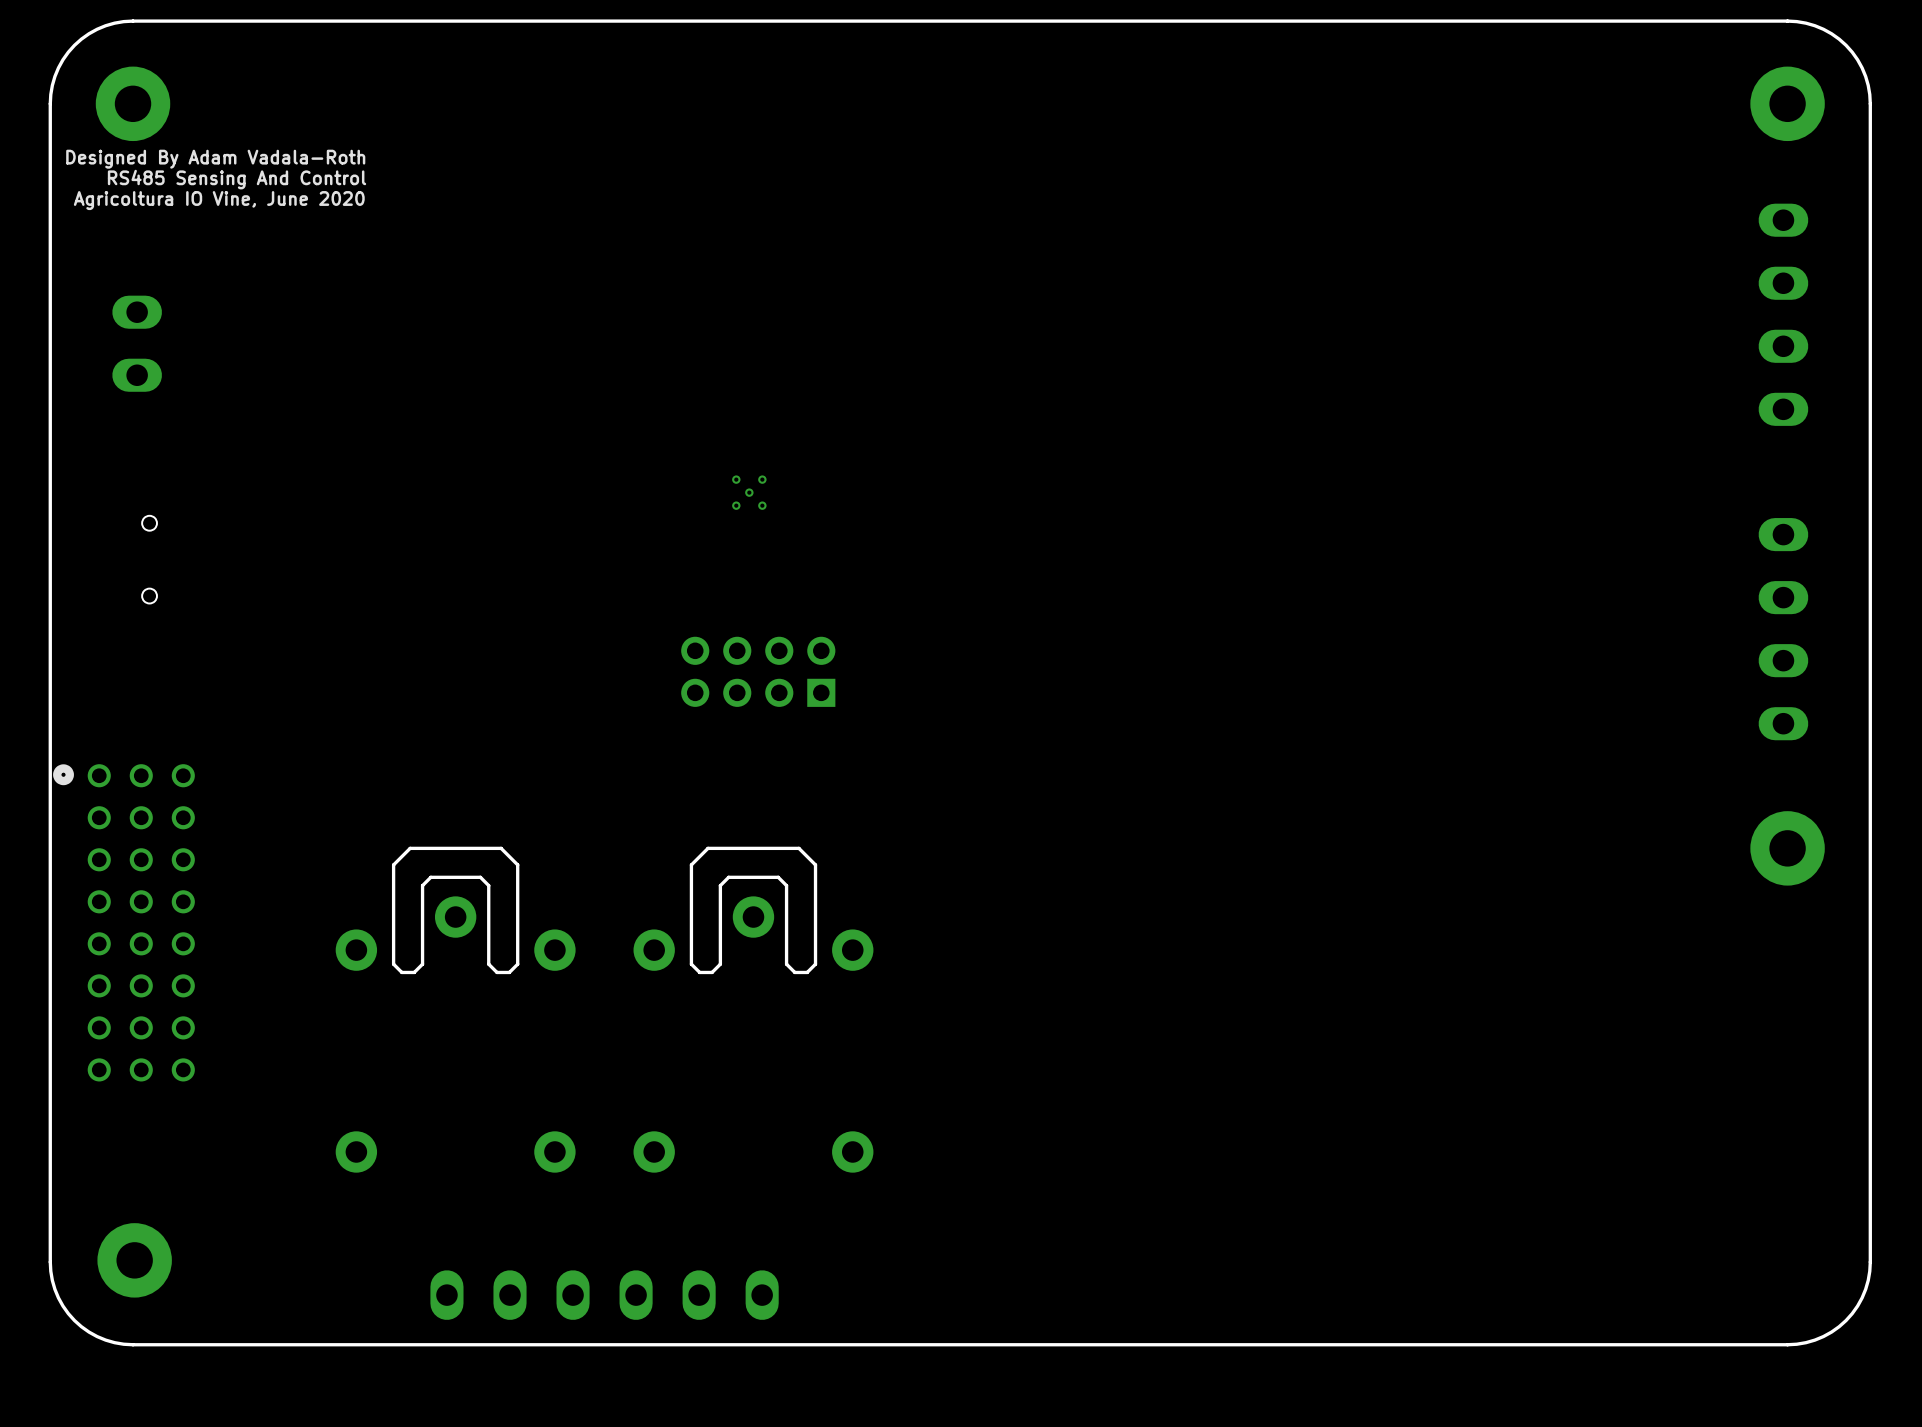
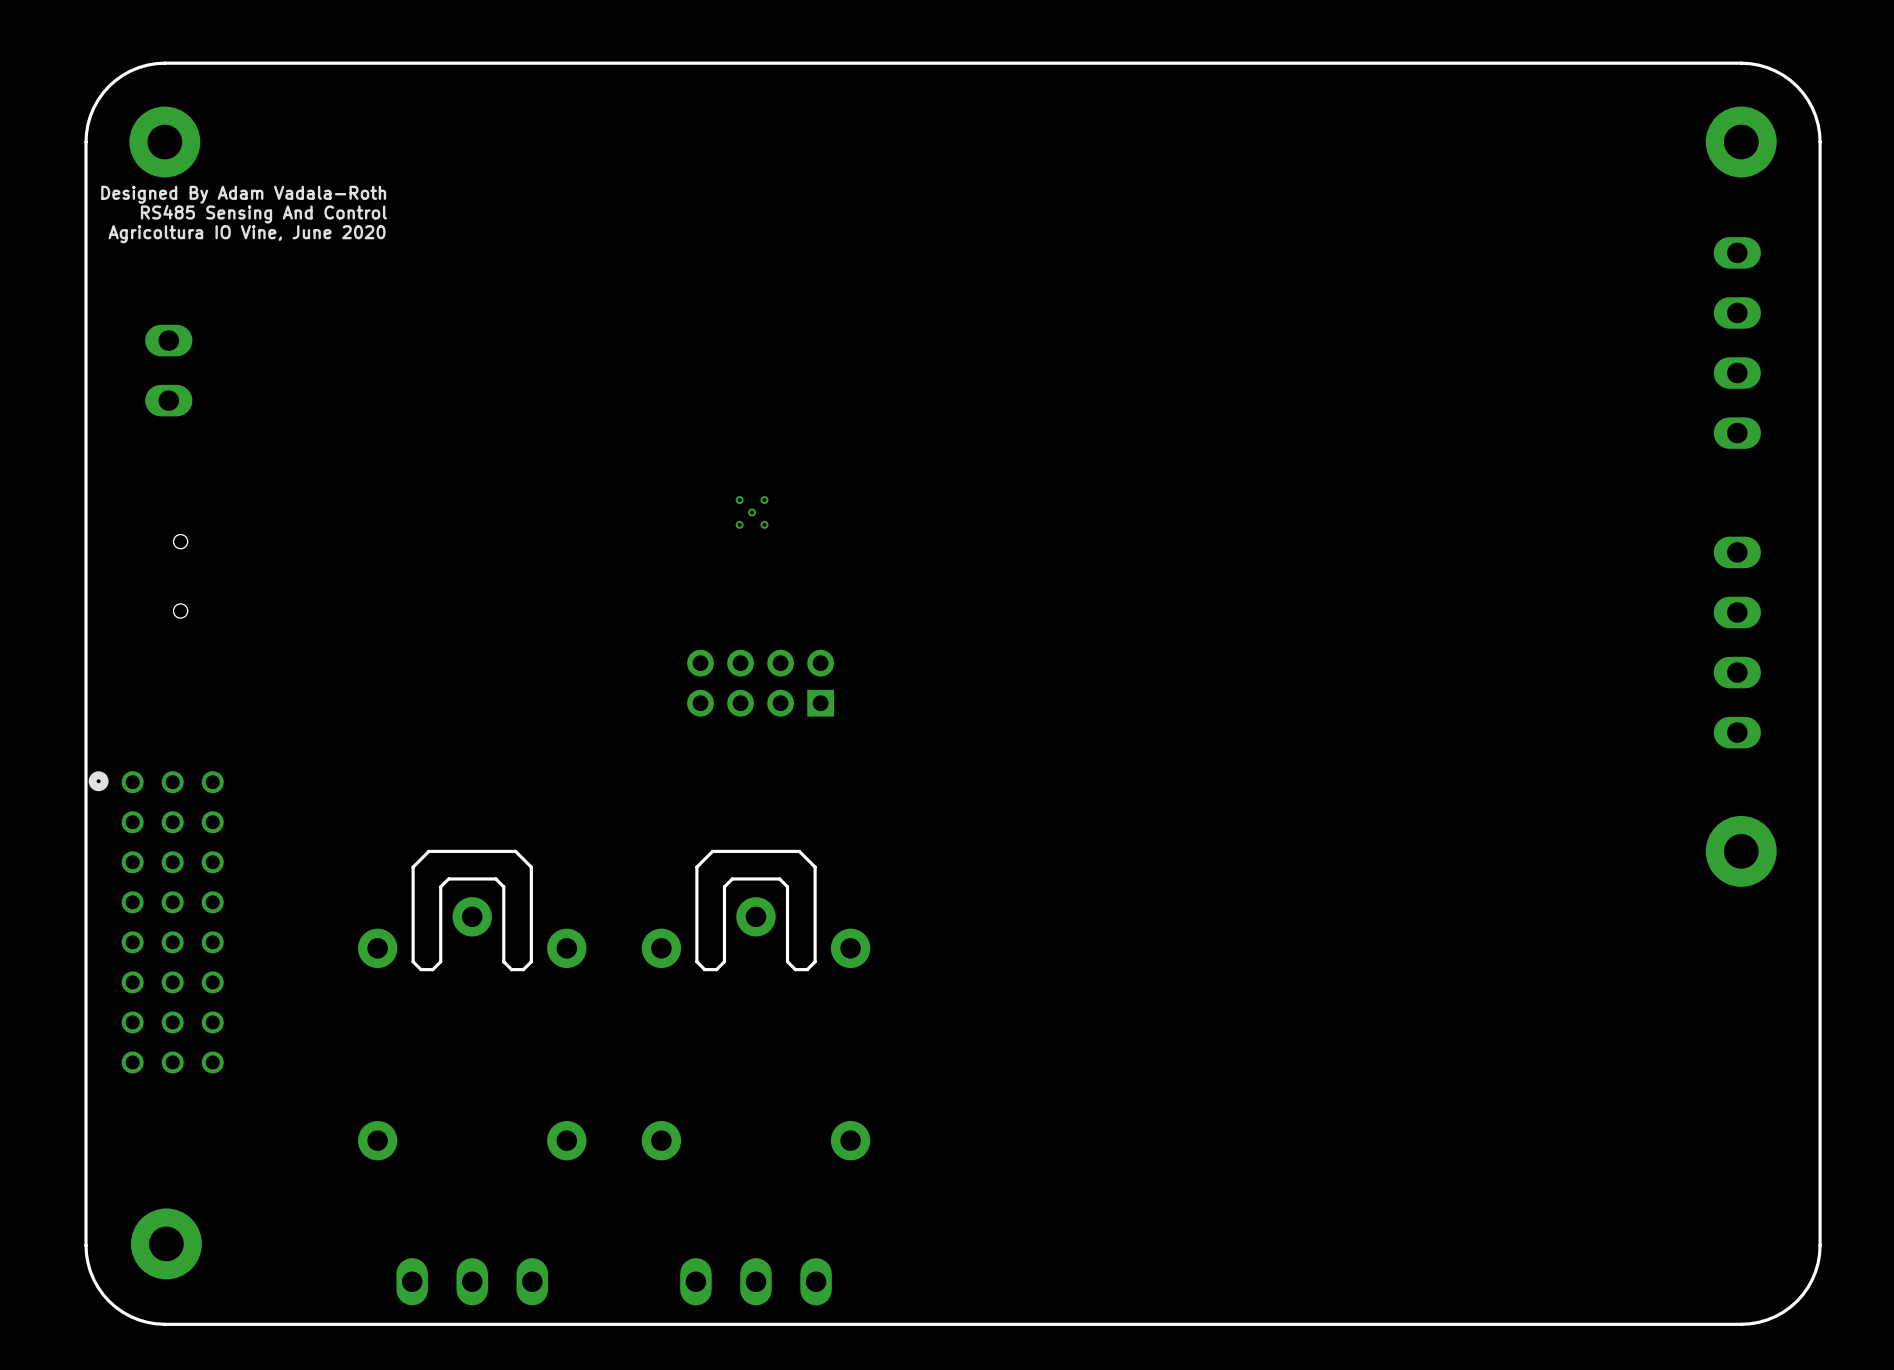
part: (604, 1295) -> none
part: none -> (472, 1281)
part: none -> (756, 1281)

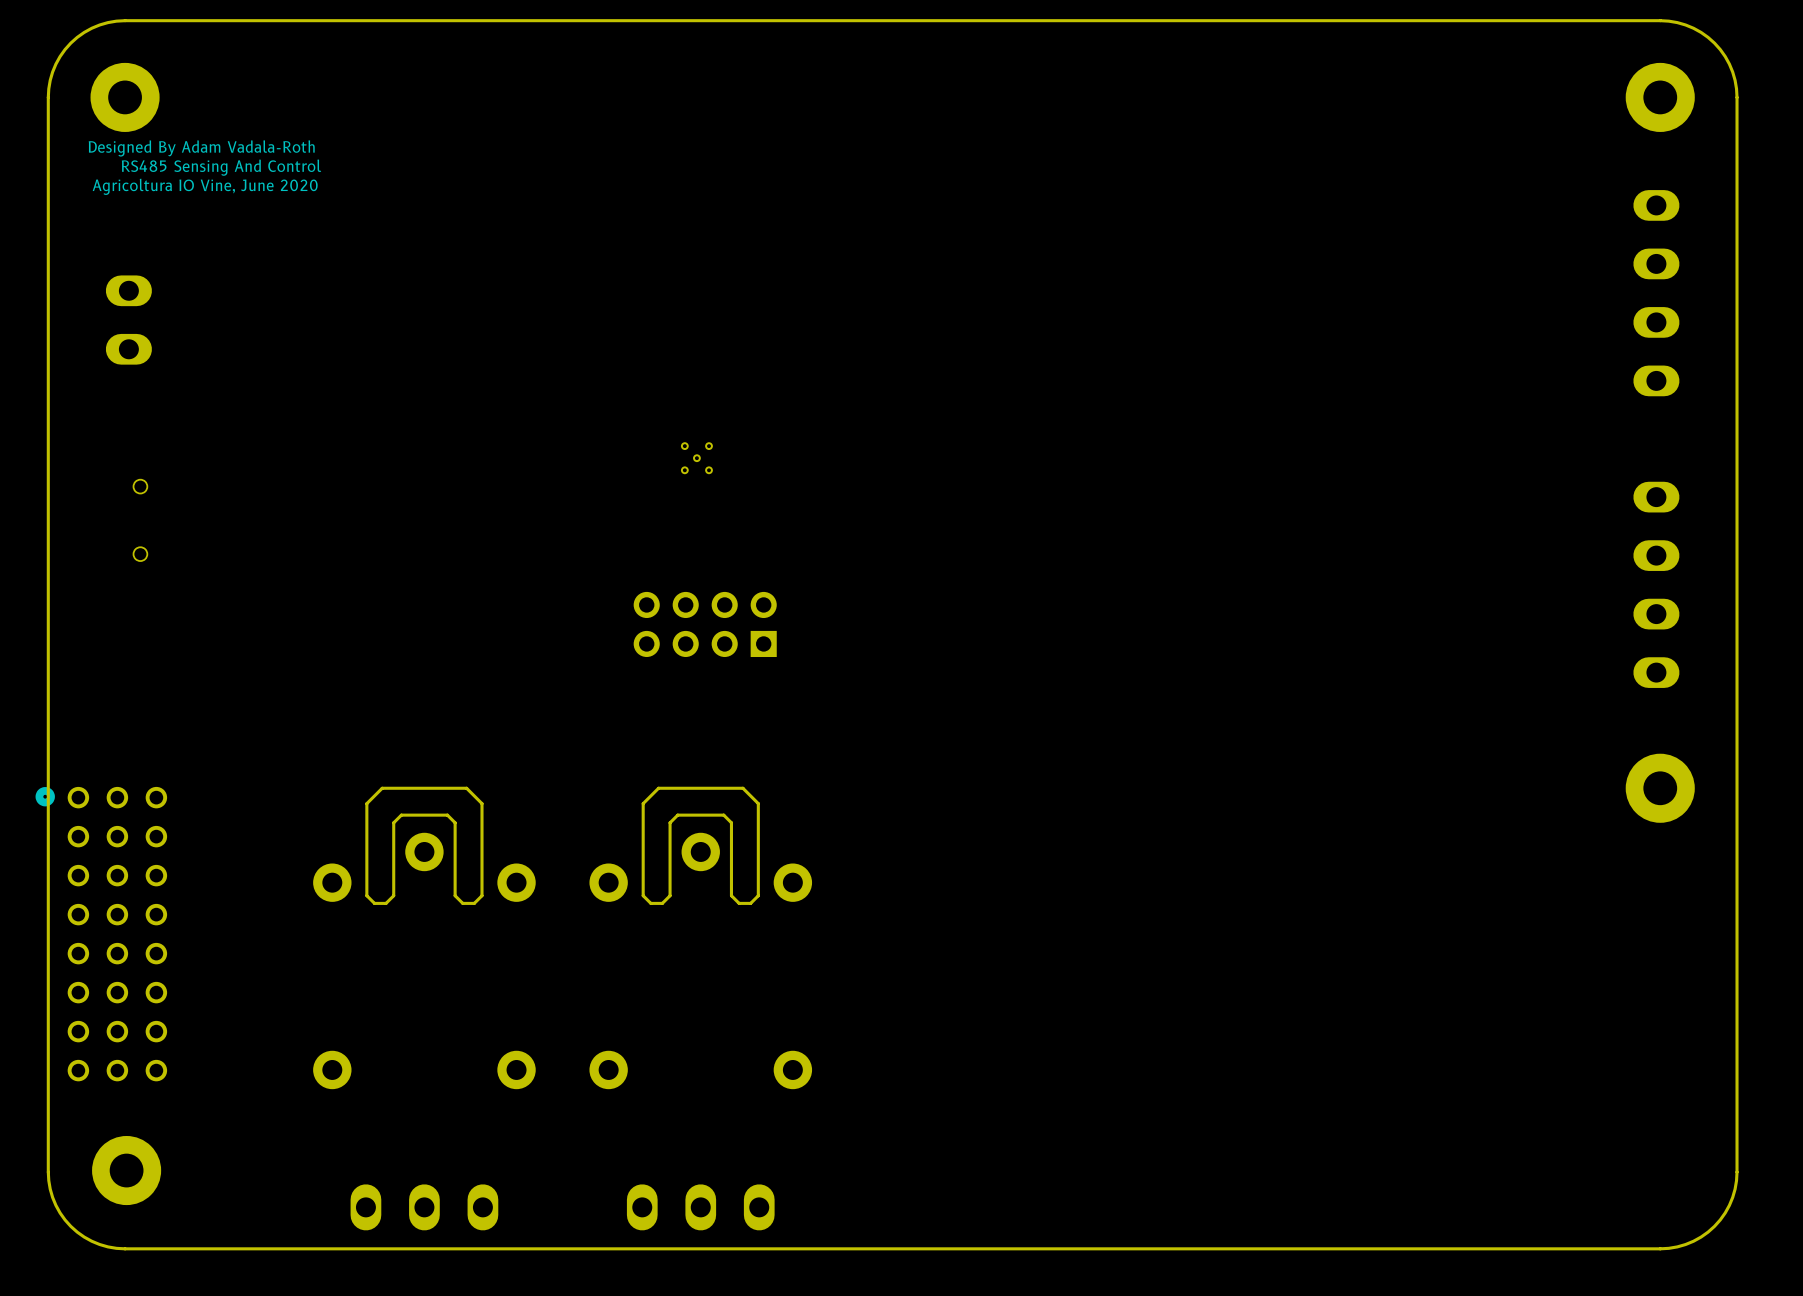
part position: (156, 922) -> (101, 934)

